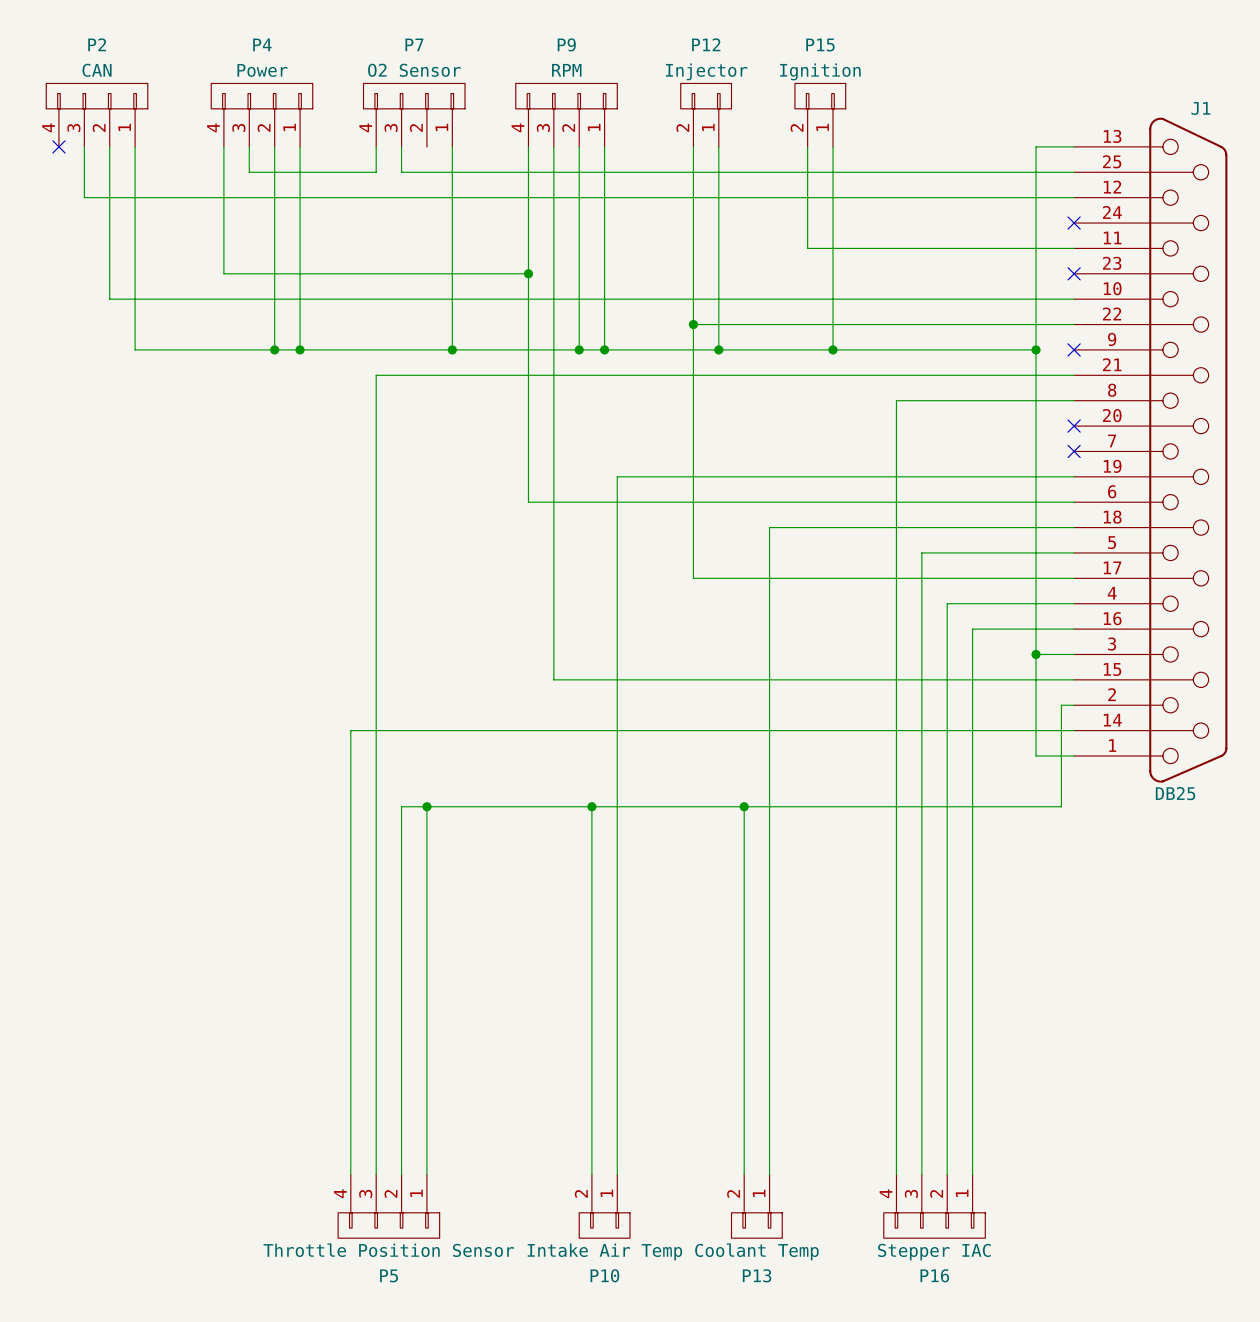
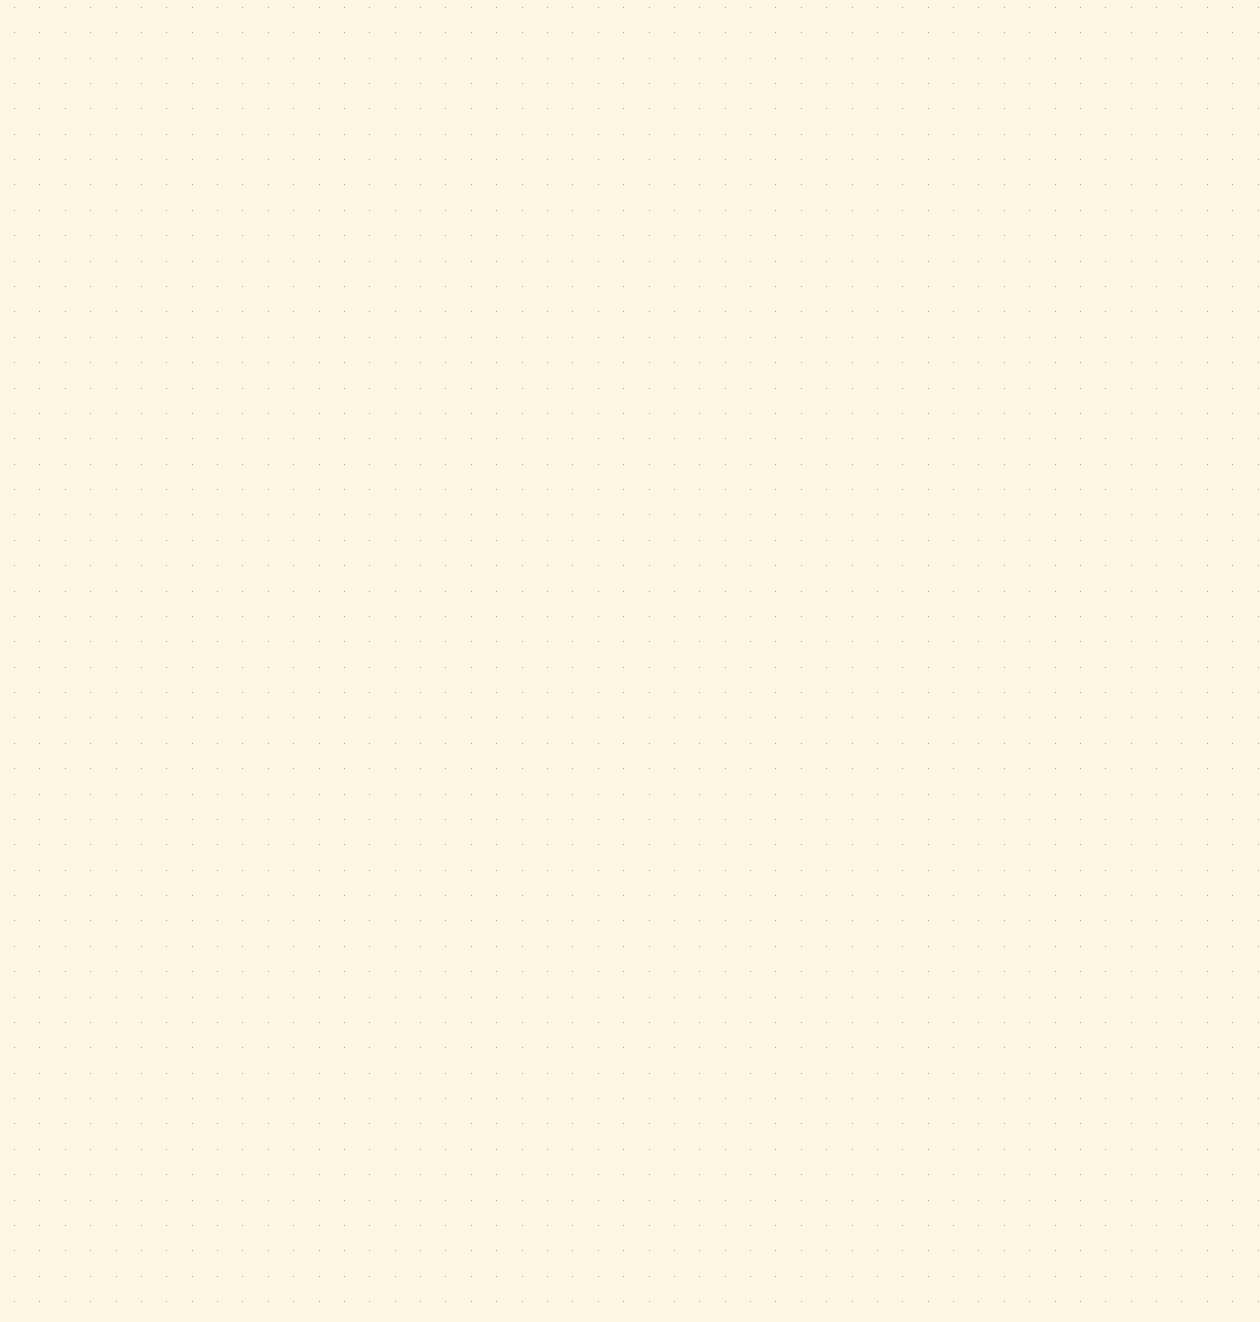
P2: CAN (97, 115) -> none
P4: Power (261, 115) -> none
P7: O2 Sensor (414, 115) -> none
P9: RPM (566, 115) -> none
P12: Injector (706, 115) -> none
P15: Ignition (820, 115) -> none
no-connect mark: (58, 146) -> none
wire: (84, 146) (84, 197) (1074, 197) -> none
wire: (109, 146) (109, 299) (1074, 299) -> none
wire: (135, 146) (135, 349) (1036, 349) -> none
wire: (223, 146) (223, 273) (528, 273) -> none
wire: (249, 146) (249, 172) (376, 172) (376, 146) -> none
wire: (274, 146) (274, 349) -> none
wire: (300, 146) (300, 349) -> none
wire: (401, 146) (401, 172) (1074, 172) -> none
wire: (452, 146) (452, 349) -> none
wire: (528, 146) (528, 502) (1074, 502) -> none
wire: (553, 146) (553, 679) (1074, 679) -> none
wire: (579, 146) (579, 349) -> none
wire: (604, 146) (604, 349) -> none
wire: (693, 146) (693, 578) (1074, 578) -> none
wire: (718, 146) (718, 349) -> none
wire: (807, 146) (807, 248) (1074, 248) -> none
wire: (833, 146) (833, 349) -> none
wire: (1074, 146) (1036, 146) (1036, 755) (1074, 755) -> none
no-connect mark: (1074, 223) -> none
junction: (528, 273) -> none
no-connect mark: (1074, 273) -> none
wire: (693, 324) (1074, 324) -> none
junction: (693, 324) -> none
junction: (274, 349) -> none
junction: (300, 349) -> none
junction: (452, 349) -> none
junction: (579, 349) -> none
junction: (604, 349) -> none
junction: (718, 349) -> none
junction: (833, 349) -> none
junction: (1036, 349) -> none
no-connect mark: (1074, 349) -> none
wire: (1074, 375) (376, 375) (376, 1174) -> none
wire: (1074, 400) (896, 400) (896, 1174) -> none
no-connect mark: (1074, 426) -> none
J1: DB25 (1150, 450) -> none
no-connect mark: (1074, 451) -> none
wire: (1074, 476) (617, 476) (617, 1174) -> none
wire: (1074, 527) (769, 527) (769, 1174) -> none
wire: (1074, 552) (921, 552) (921, 1174) -> none
wire: (1074, 603) (947, 603) (947, 1174) -> none
wire: (1074, 629) (972, 629) (972, 1174) -> none
wire: (1036, 654) (1074, 654) -> none
junction: (1036, 654) -> none
wire: (1074, 705) (1061, 705) (1061, 806) (401, 806) (401, 1174) -> none
wire: (1074, 730) (350, 730) (350, 1174) -> none
wire: (426, 806) (426, 1174) -> none
junction: (426, 806) -> none
wire: (591, 806) (591, 1174) -> none
junction: (591, 806) -> none
wire: (744, 806) (744, 1174) -> none
junction: (744, 806) -> none
P5: Throttle Position Sensor (388, 1206) -> none
P10: Intake Air Temp (604, 1206) -> none
P13: Coolant Temp (756, 1206) -> none
P16: Stepper IAC (934, 1206) -> none

